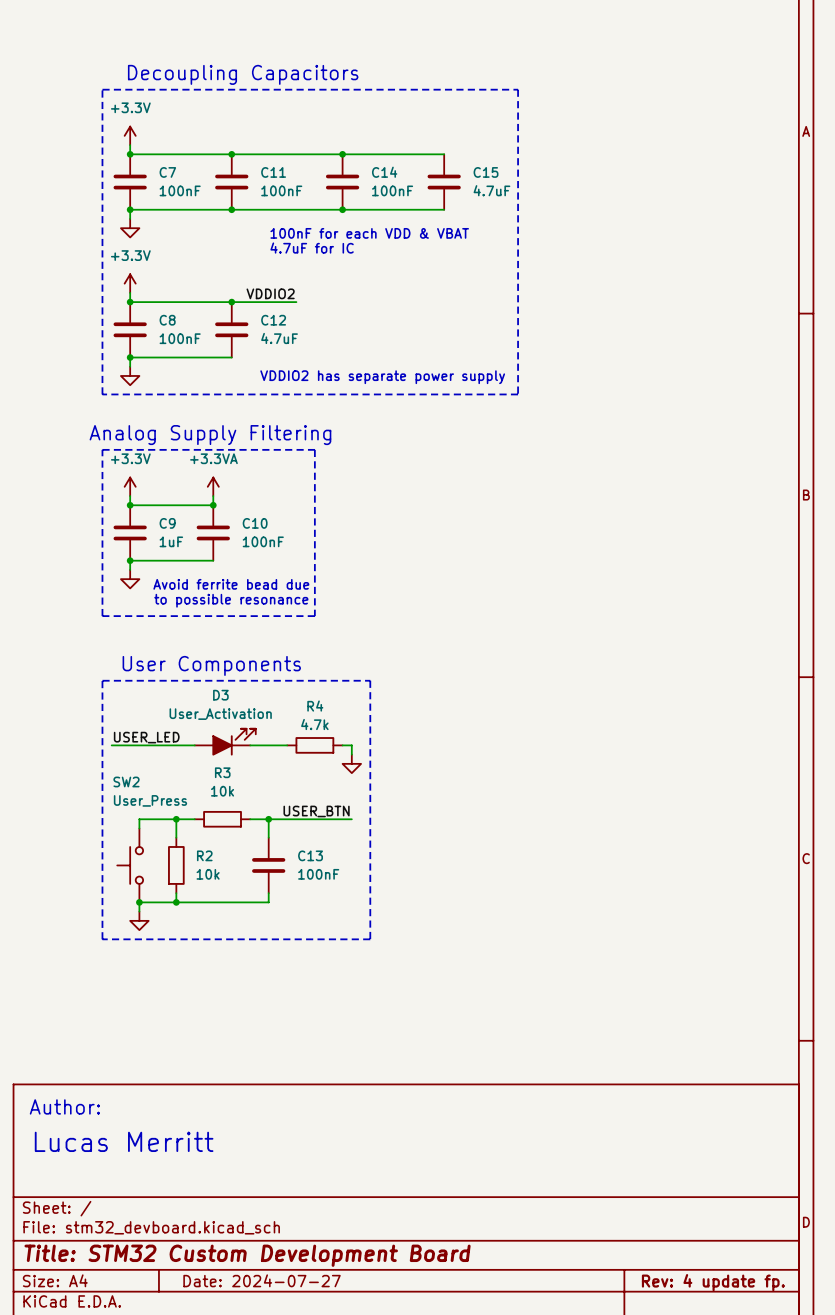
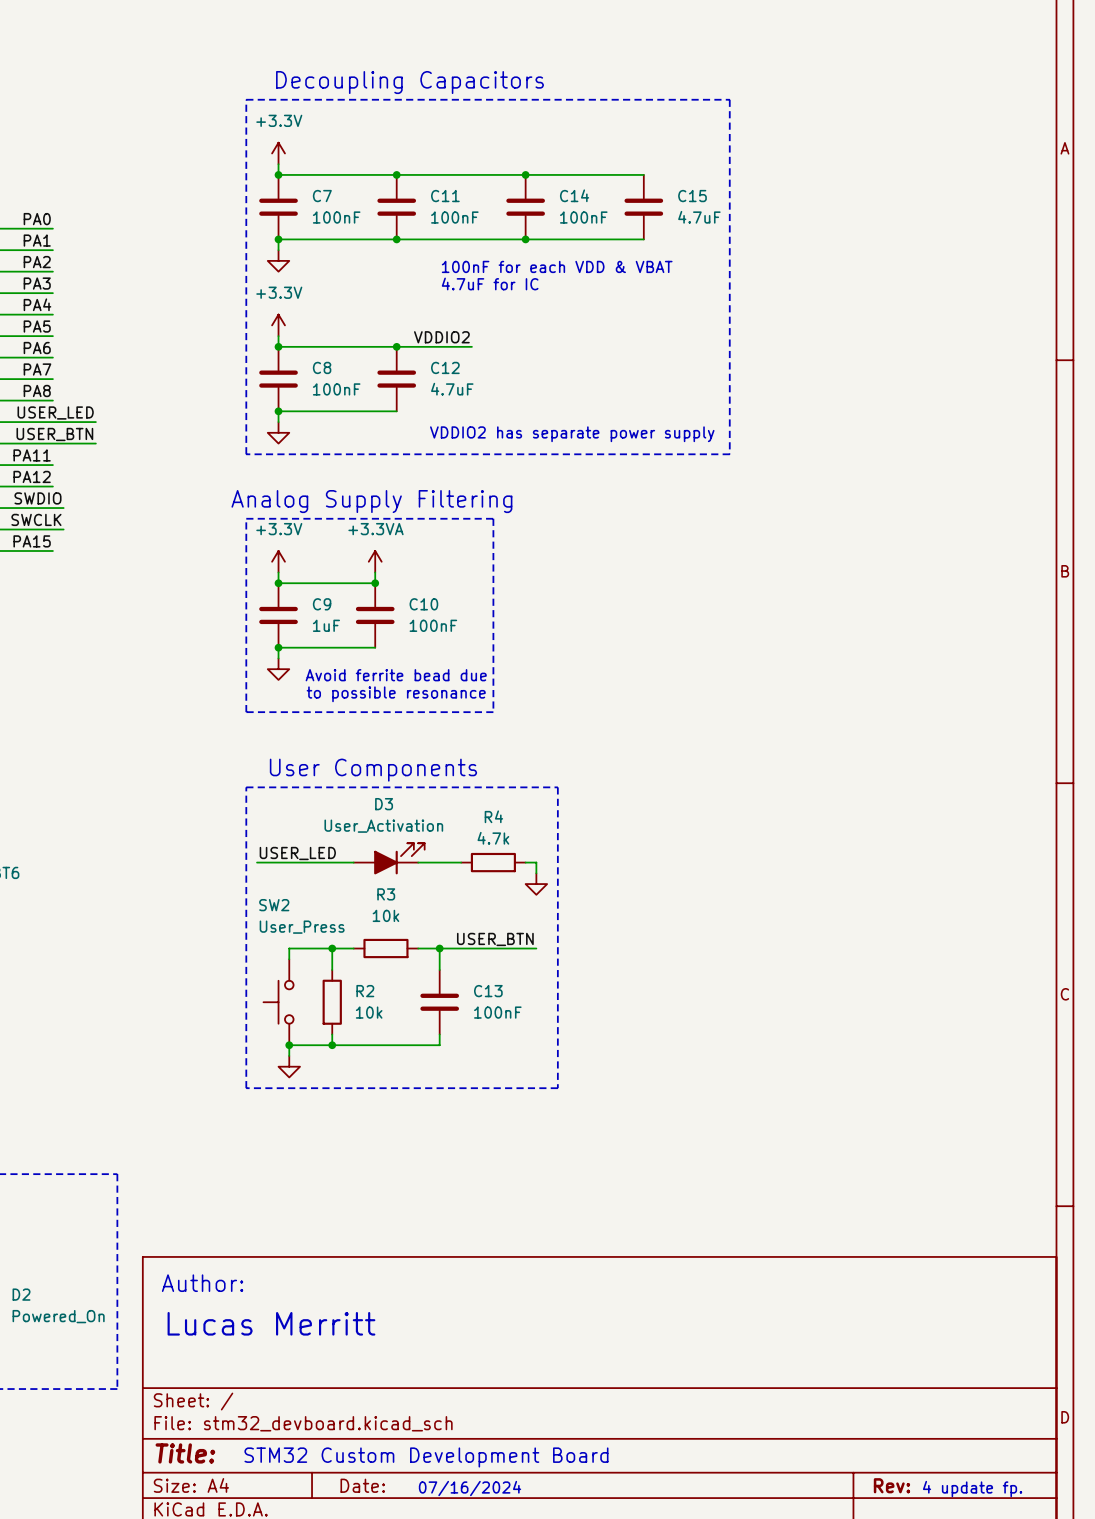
title block: Title: STM32 Custom Development Board (247, 1255) -> Title: (185, 1453)
text: none -> STM32 Custom Development Board (426, 1457)
title block: Date: 2024-07-27 (262, 1280) -> Date: (362, 1485)
title block: Rev: 4 update fp. (713, 1282) -> Rev: (891, 1485)
text: none -> 07/16/2024 (470, 1488)
text: none -> 4 update fp. (972, 1489)

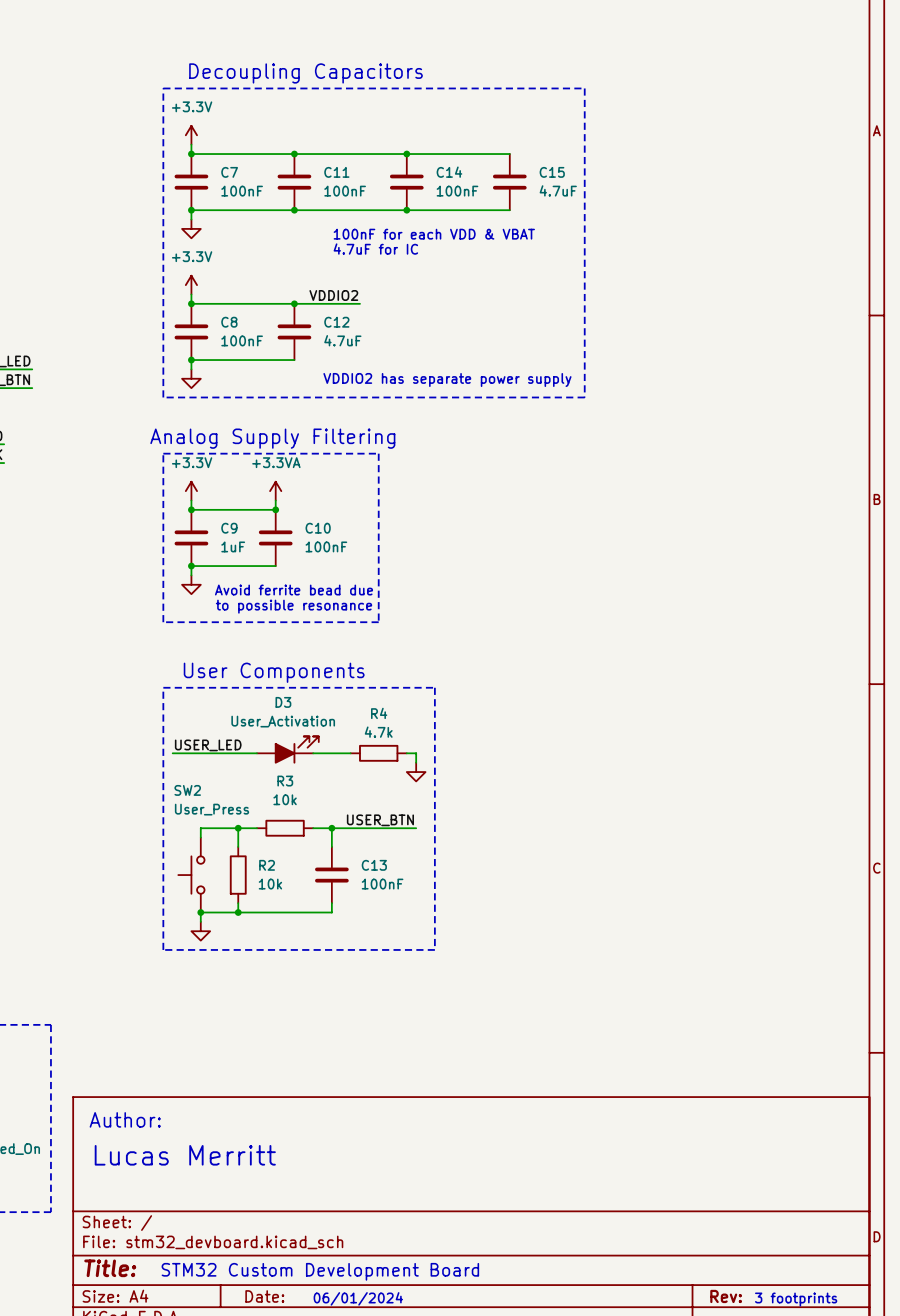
text: 07/16/2024 (470, 1488) -> 06/01/2024 (358, 1298)
text: 4 update fp. (972, 1489) -> 3 footprints (796, 1299)

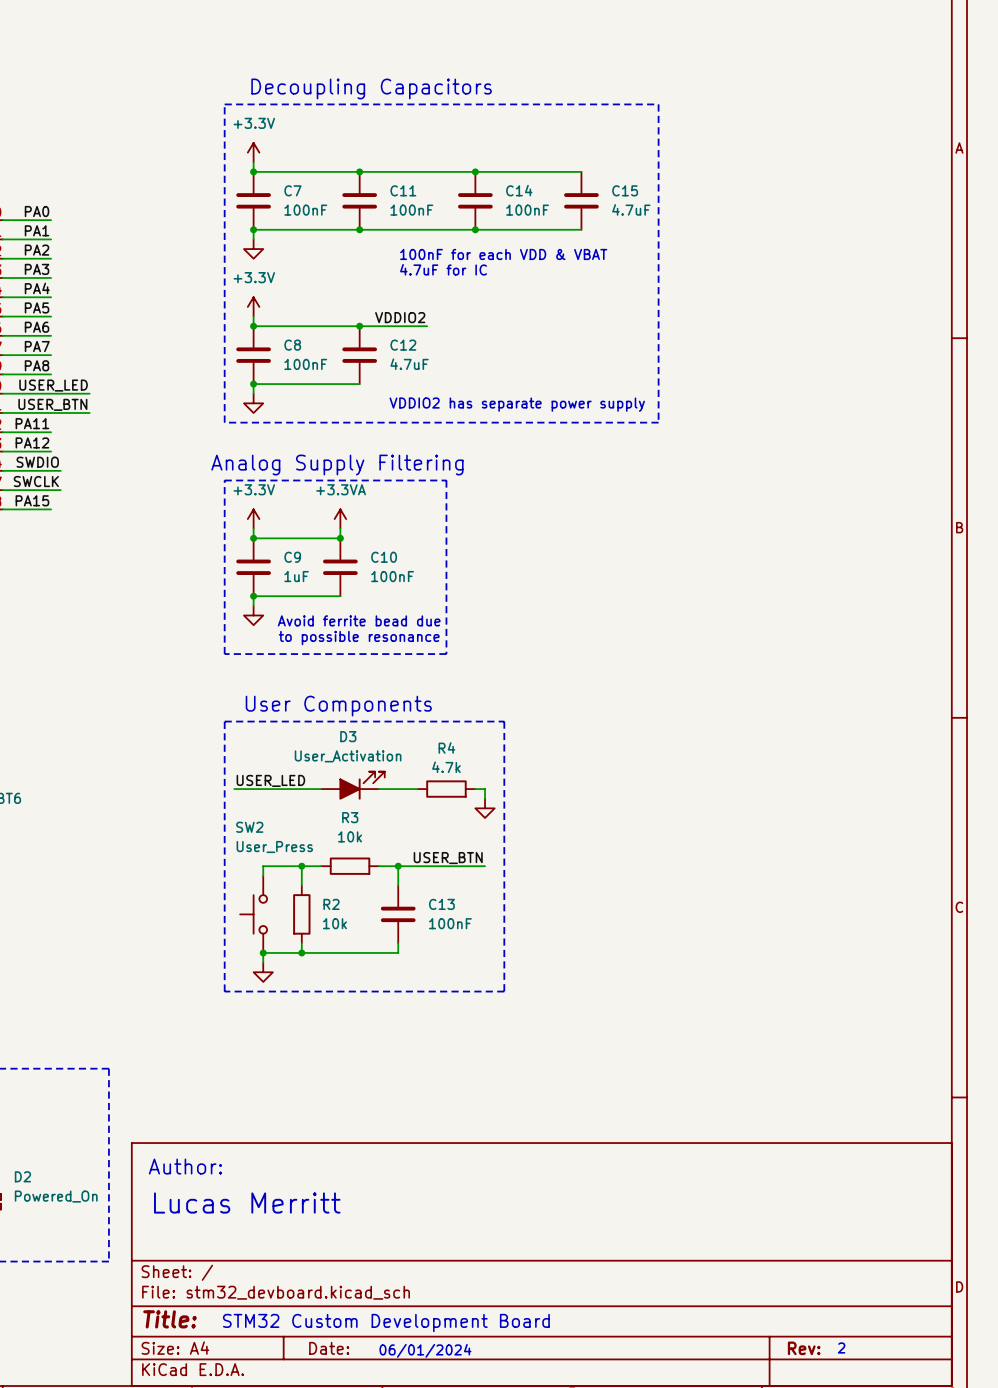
text: none -> 2 (841, 1348)
text: 3 footprints (796, 1299) -> none

